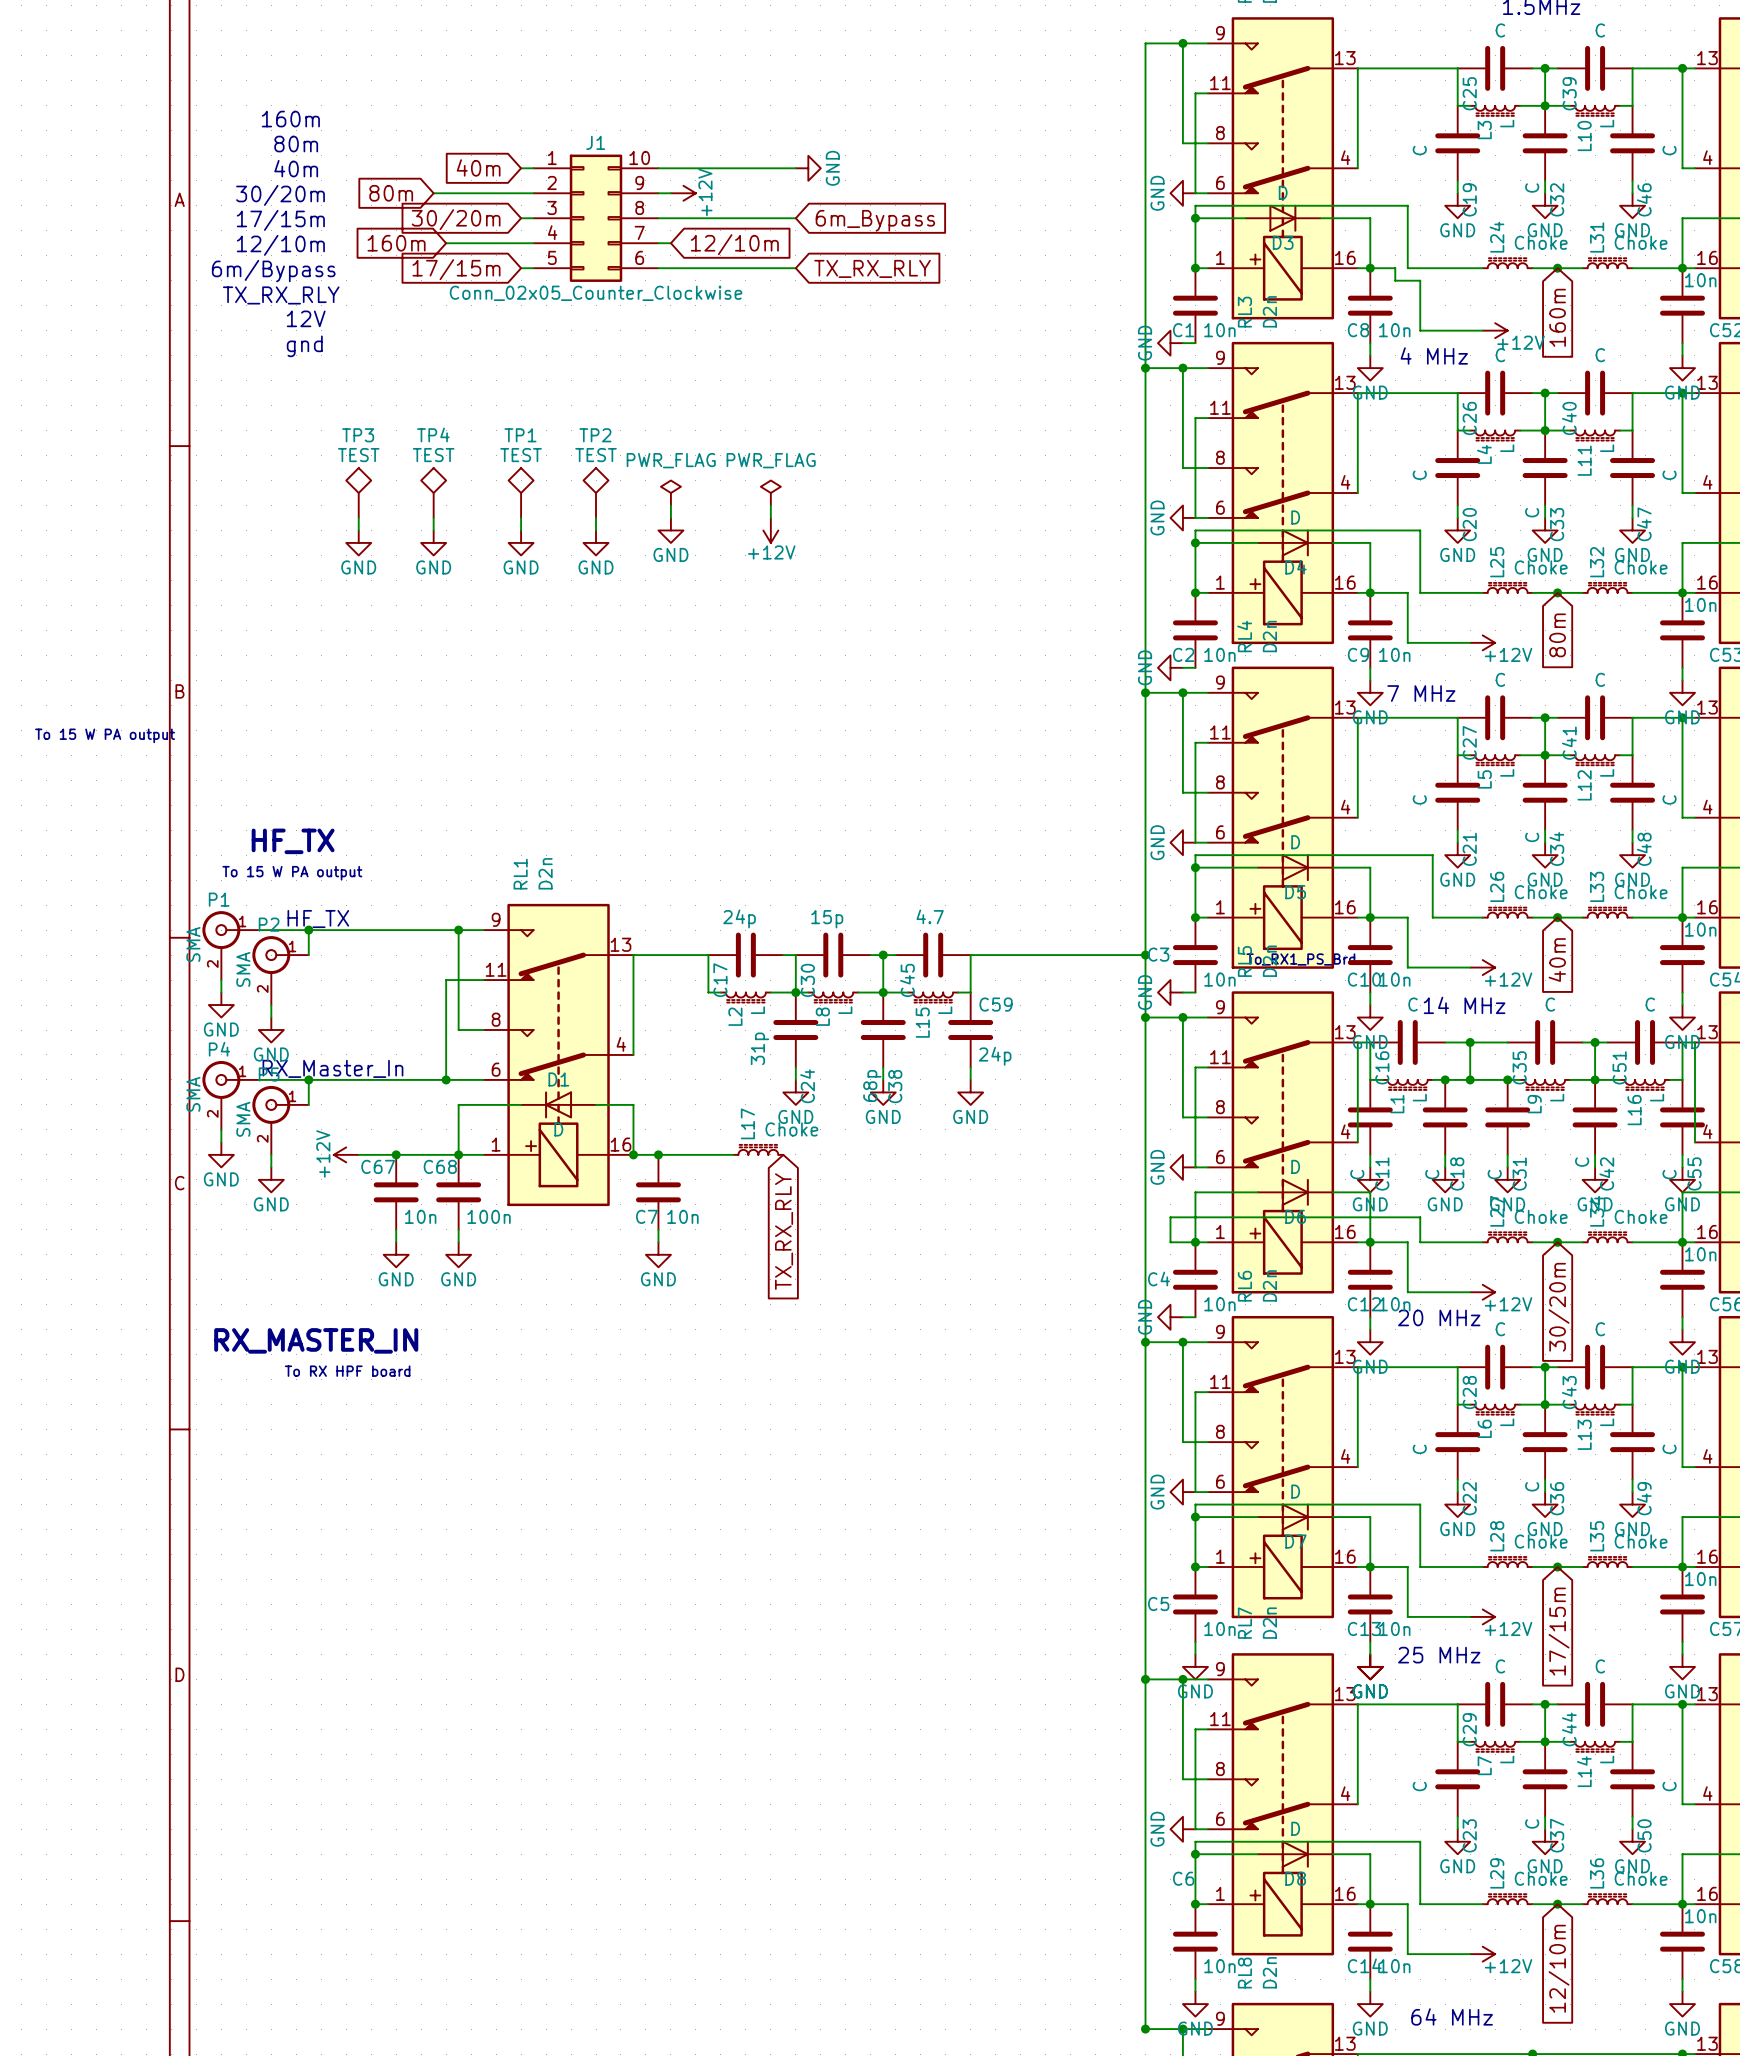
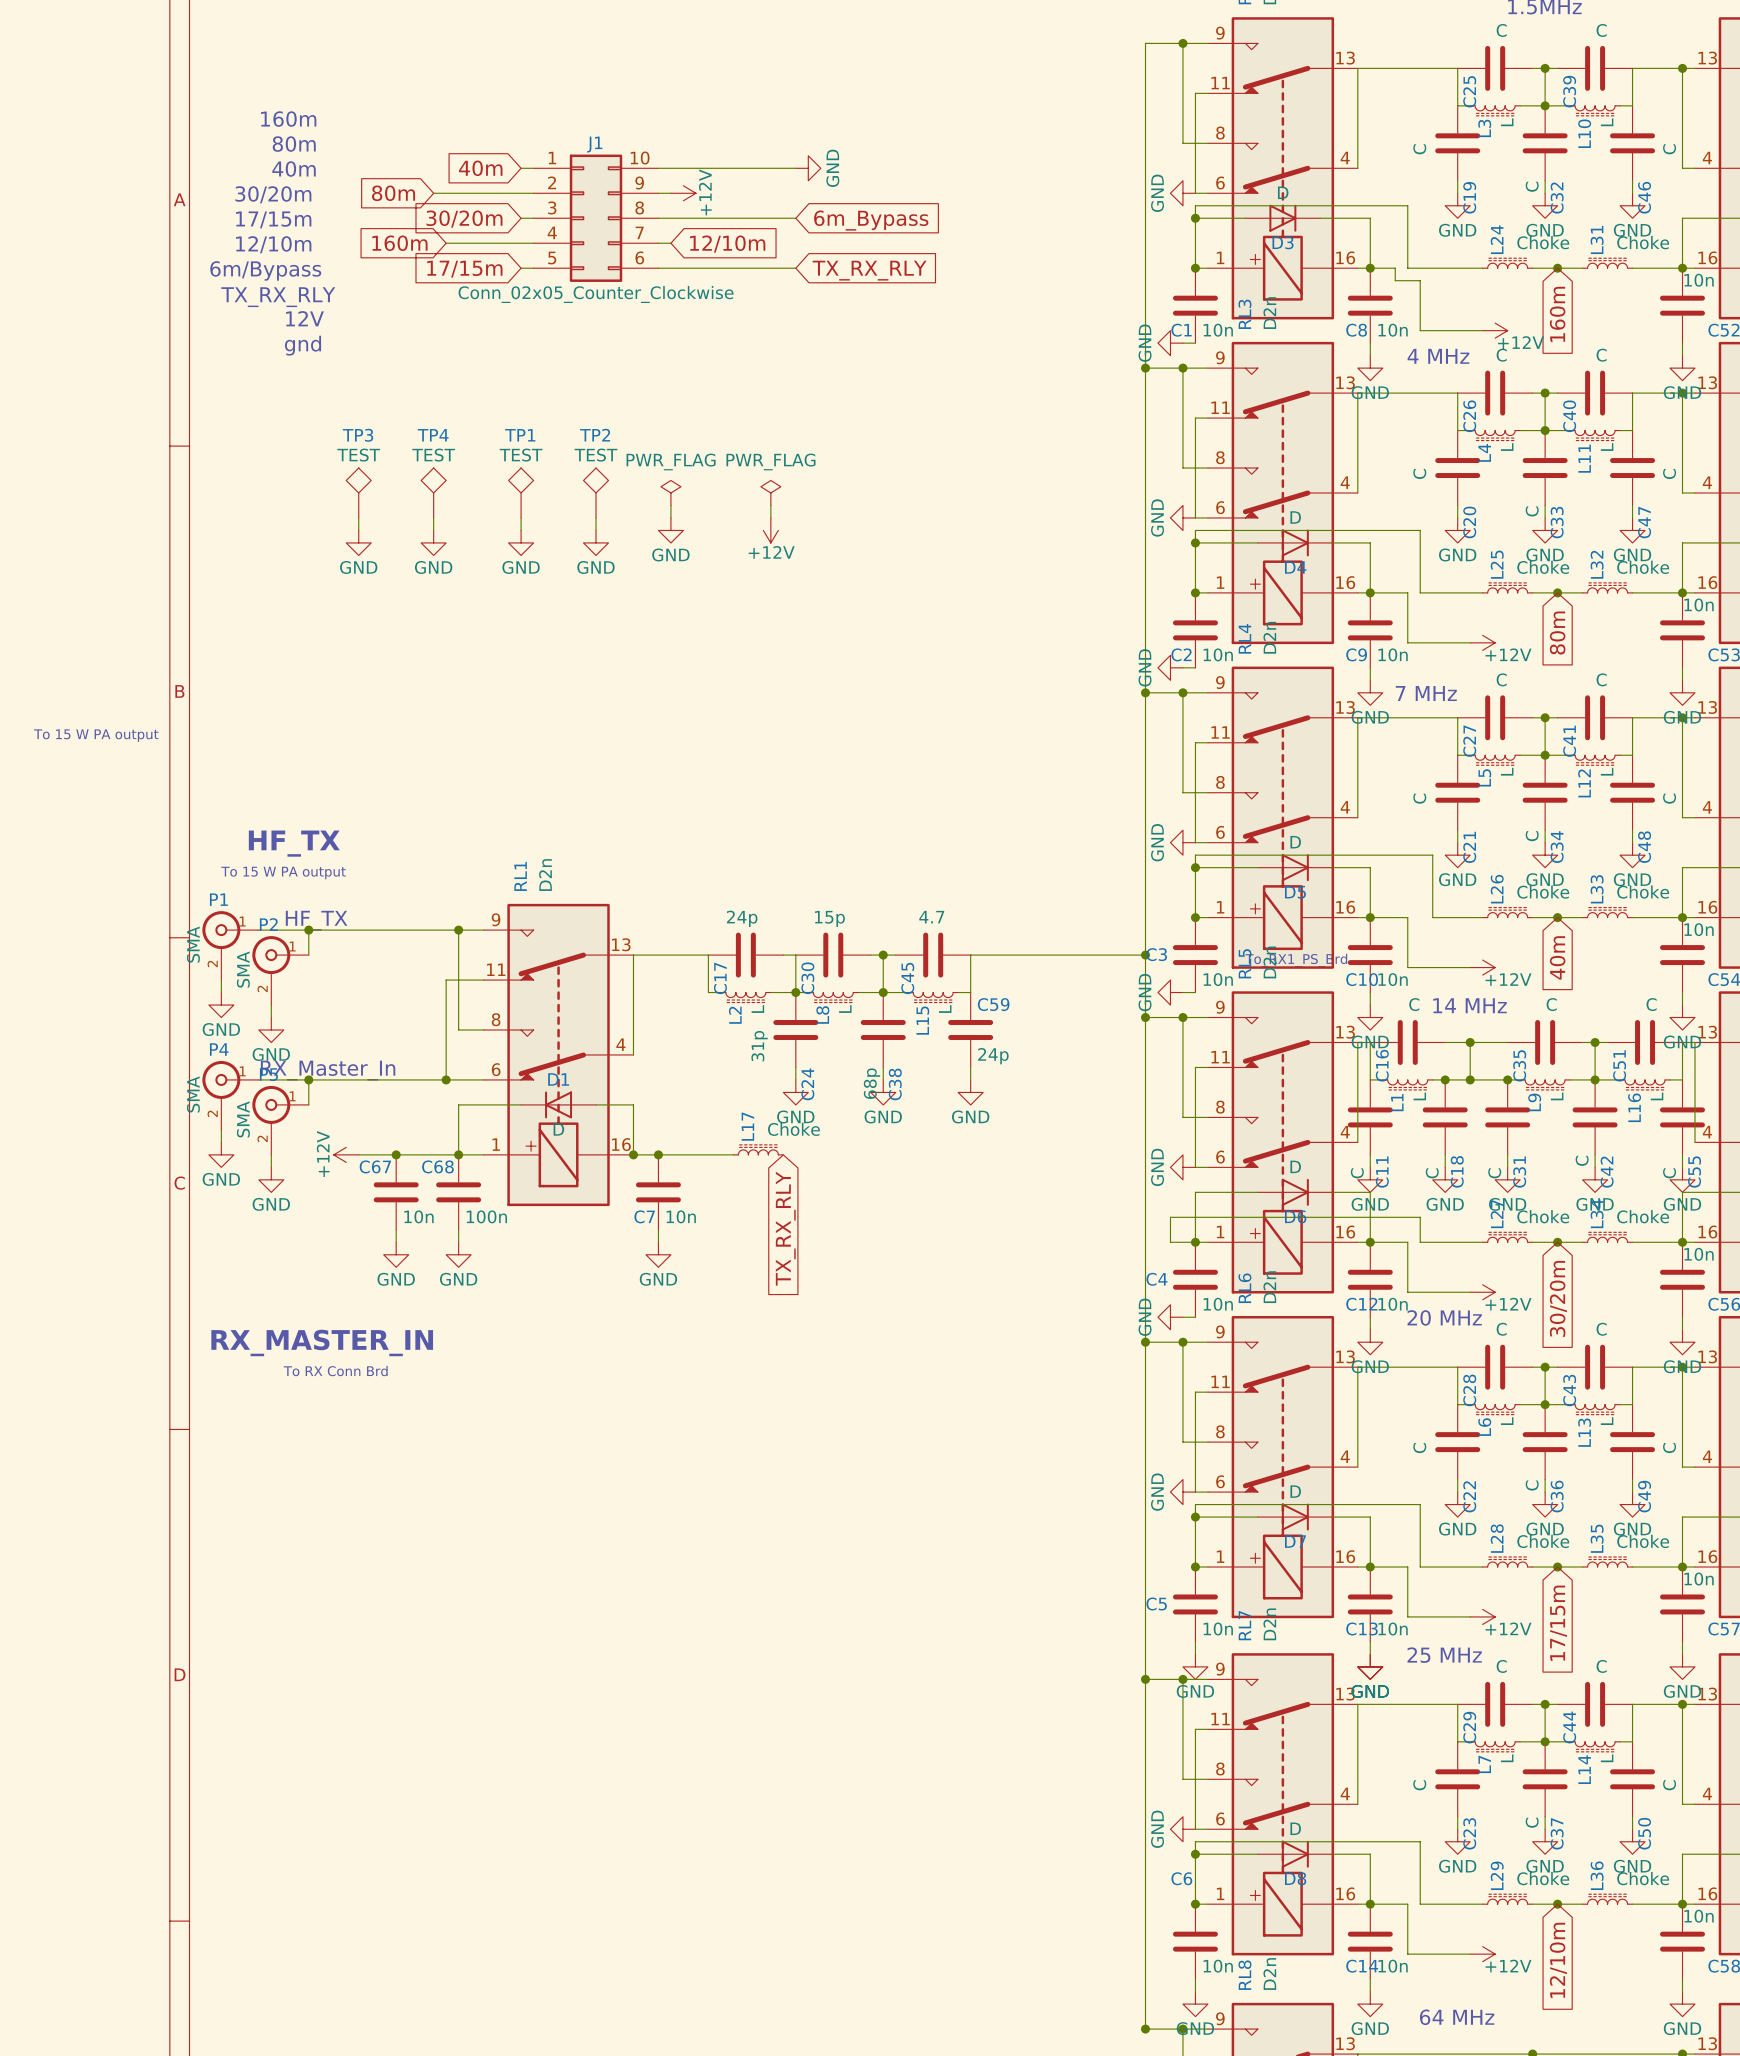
text: To RX HPF board (347, 1371) -> To RX Conn Brd (335, 1371)

